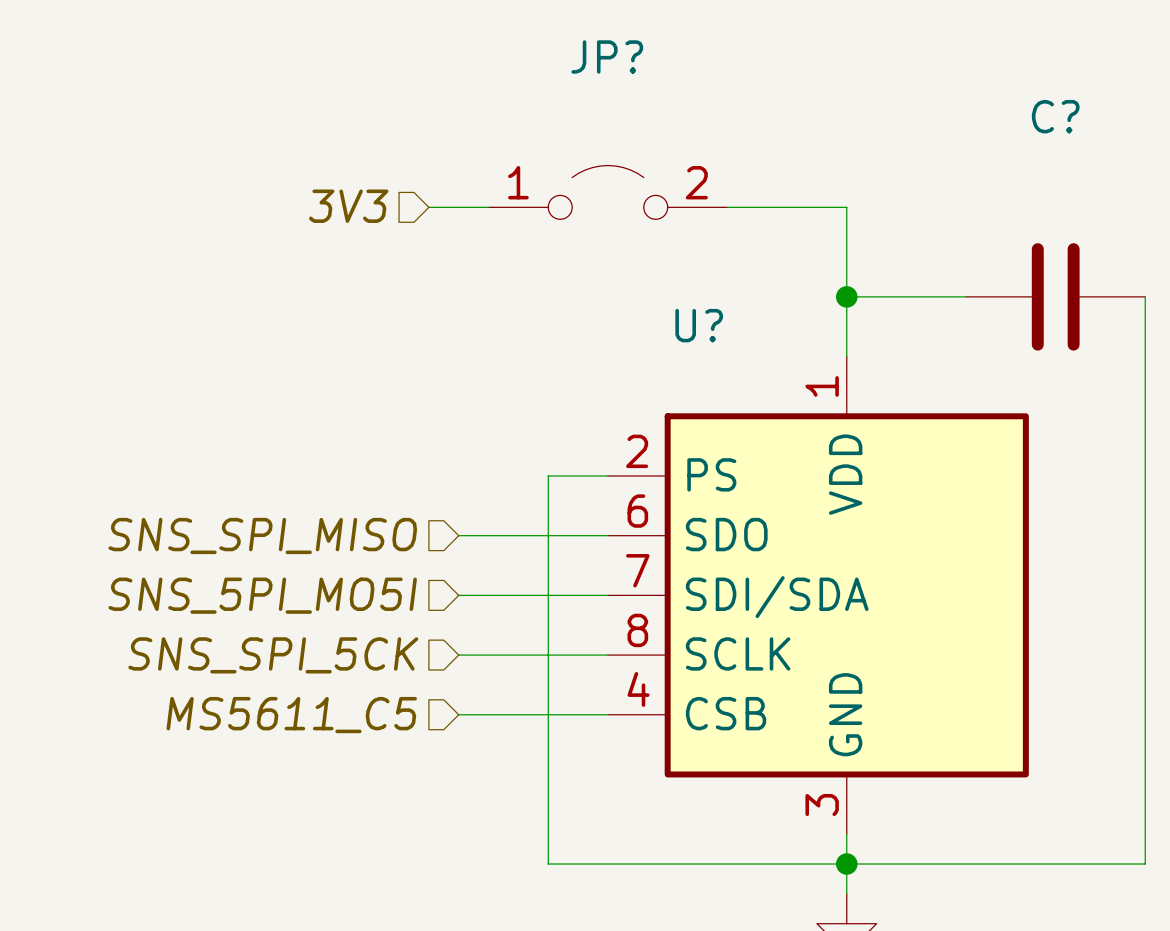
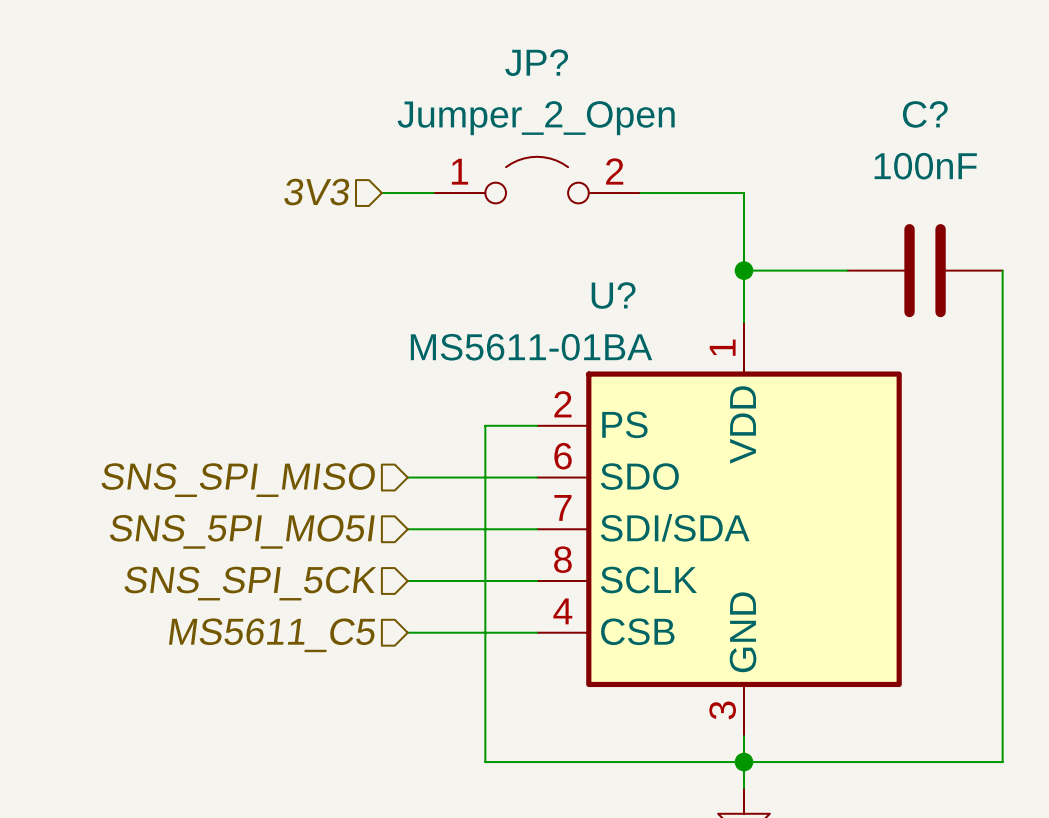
JP? value: none -> Jumper_2_Open (536, 118)
C? value: none -> 100nF (925, 166)
U? value: none -> MS5611-01BA (531, 347)

